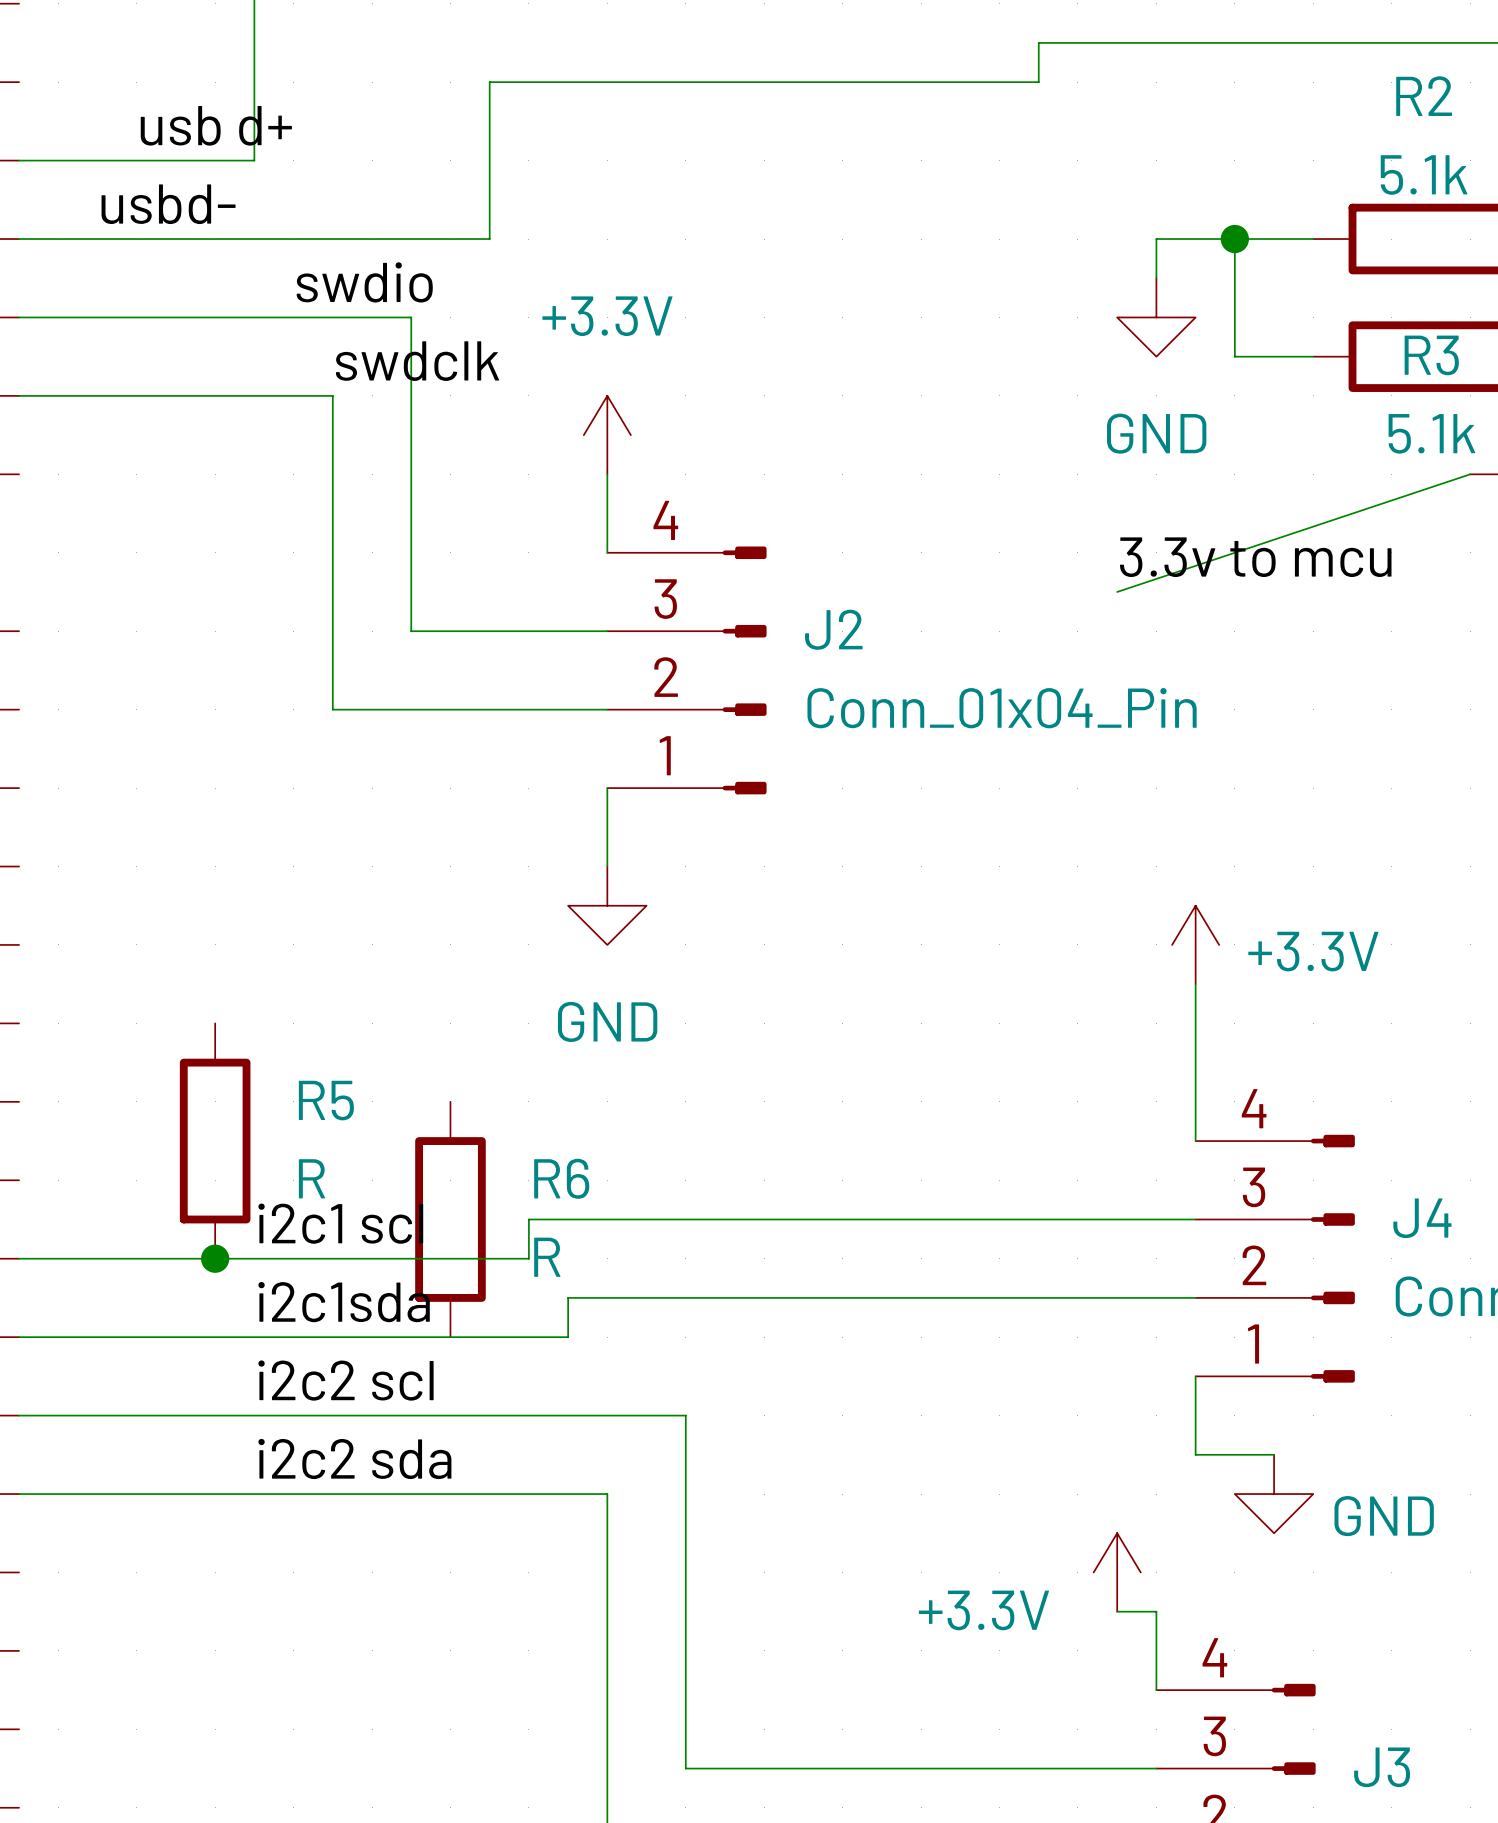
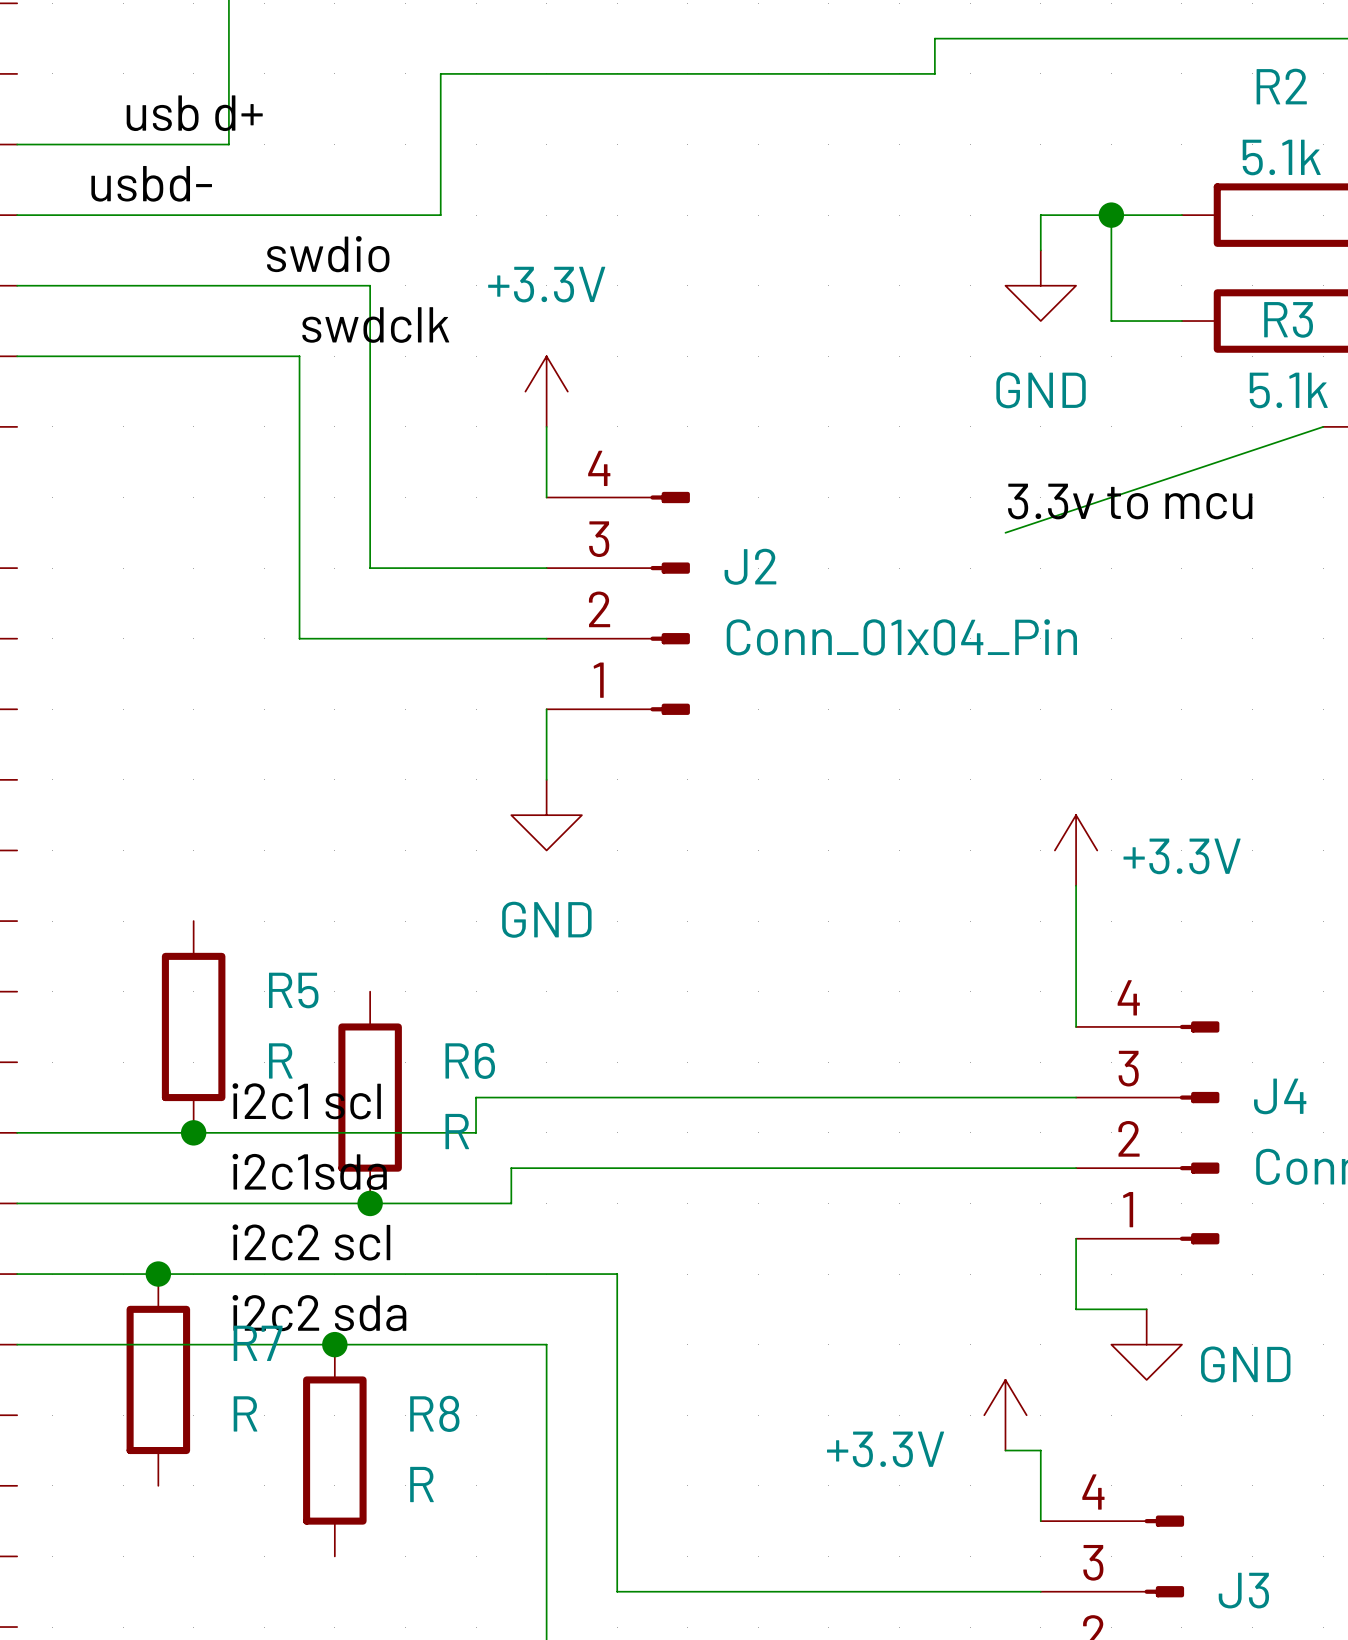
R6 position: (450, 1219) -> (370, 1097)
junction: none -> (370, 1203)
junction: none -> (158, 1274)
junction: none -> (334, 1344)
R7: none -> R (158, 1379)
R8: none -> R (334, 1450)

